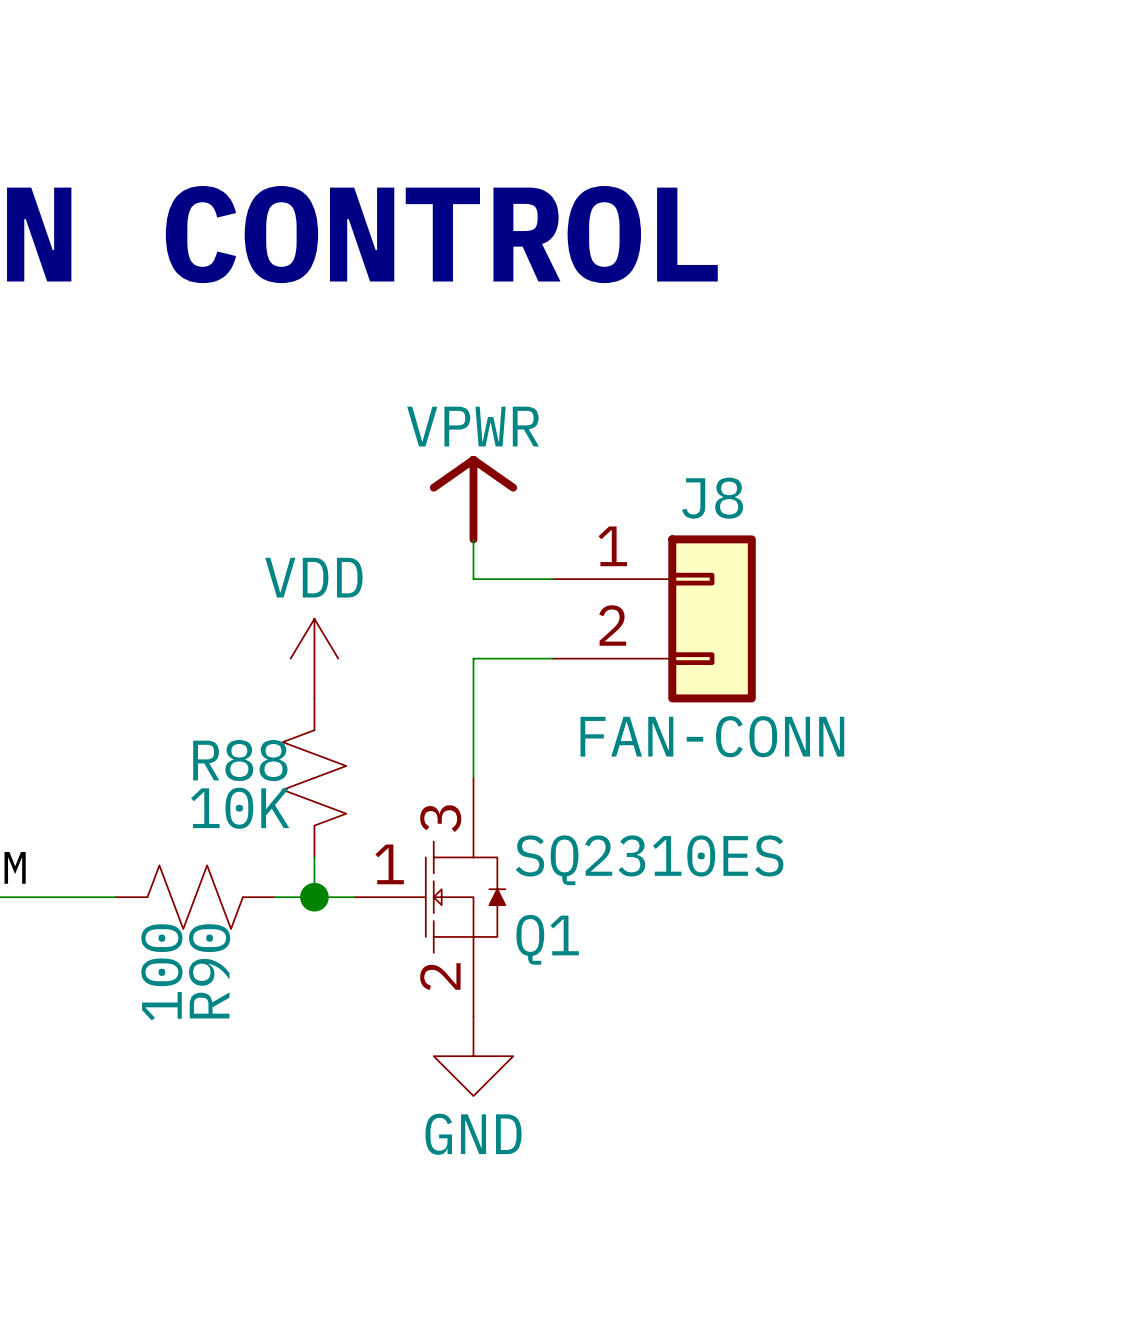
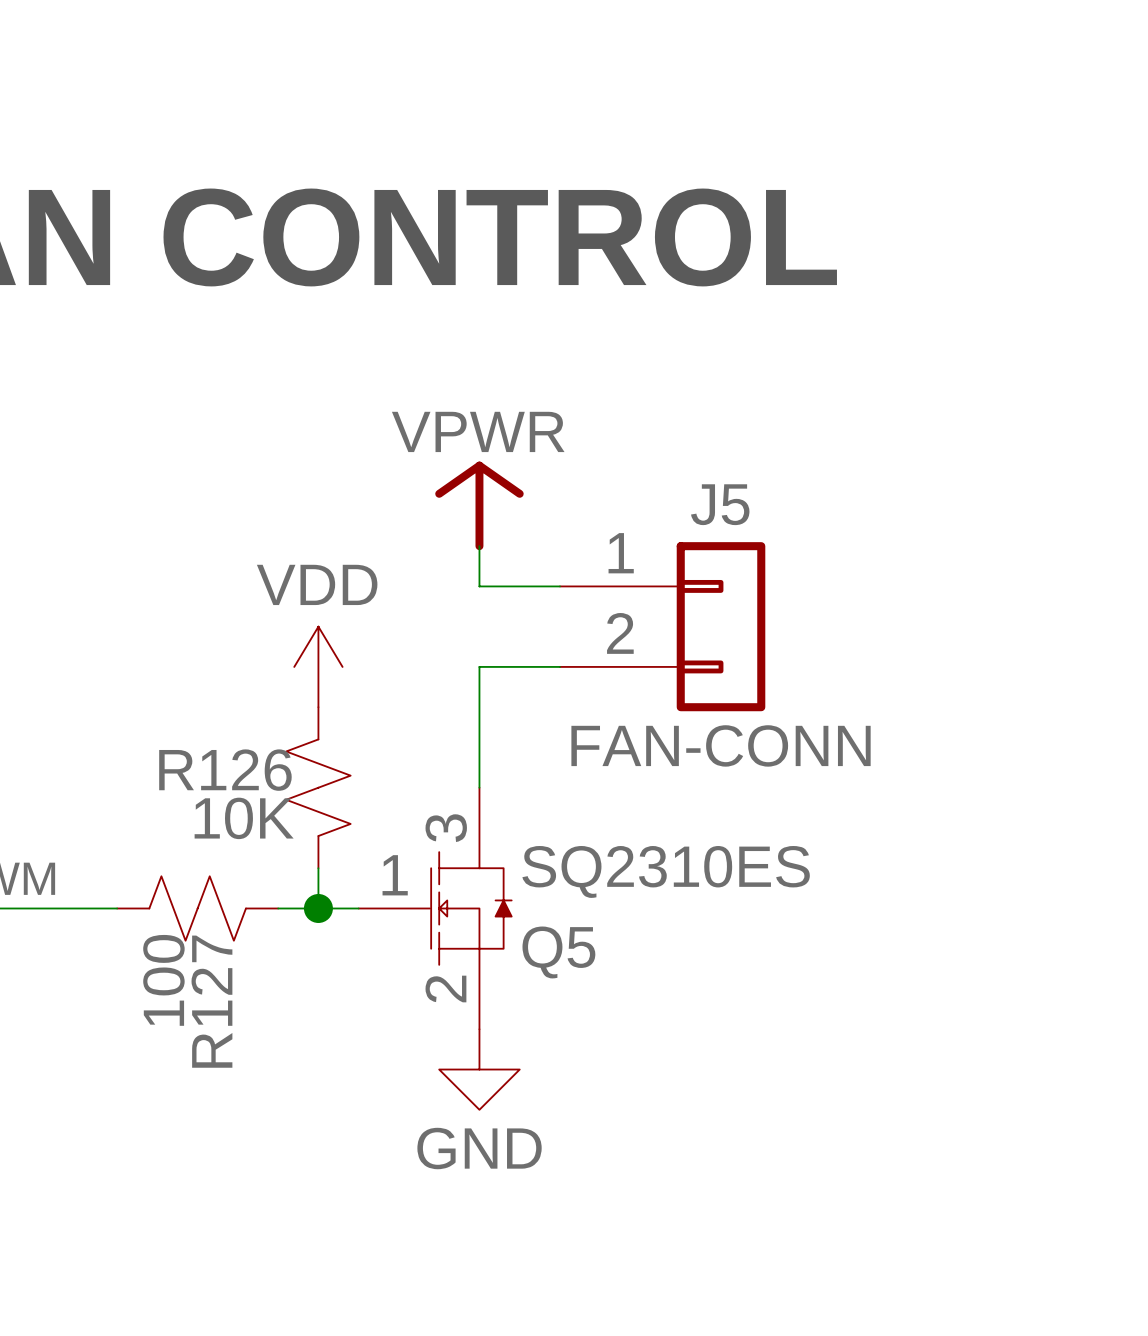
J8 name: J8 (712, 498) -> J5 (720, 504)
R88 name: R88 (240, 760) -> R126 (225, 770)
Q1 name: Q1 (547, 939) -> Q5 (558, 952)
R90 name: R90 (209, 971) -> R127 (211, 1001)

